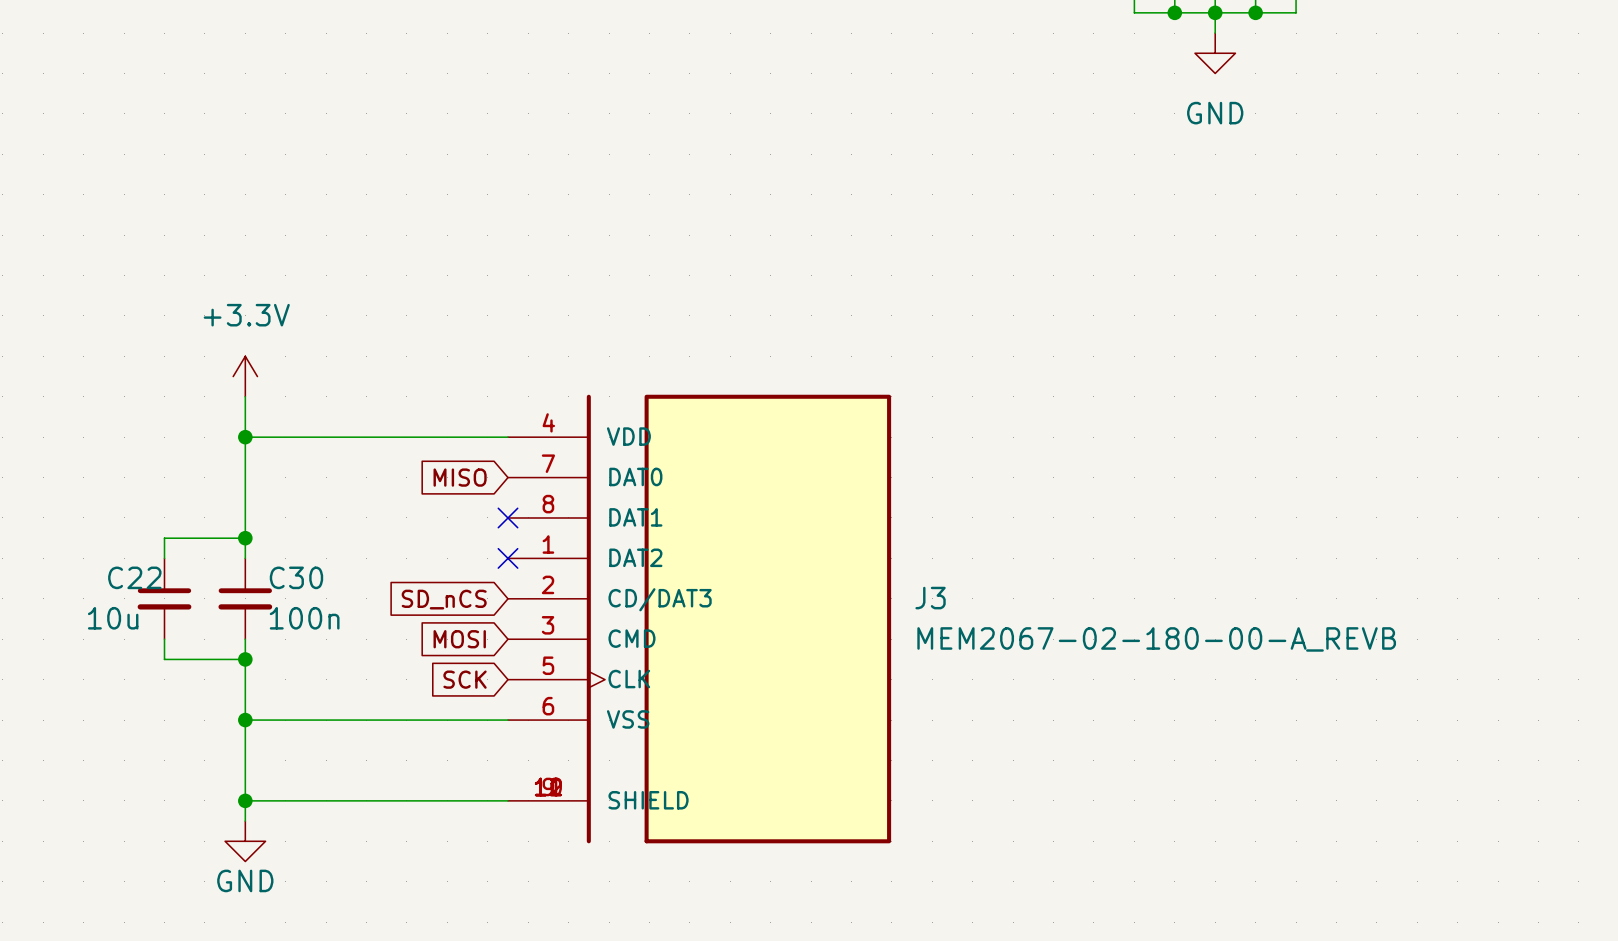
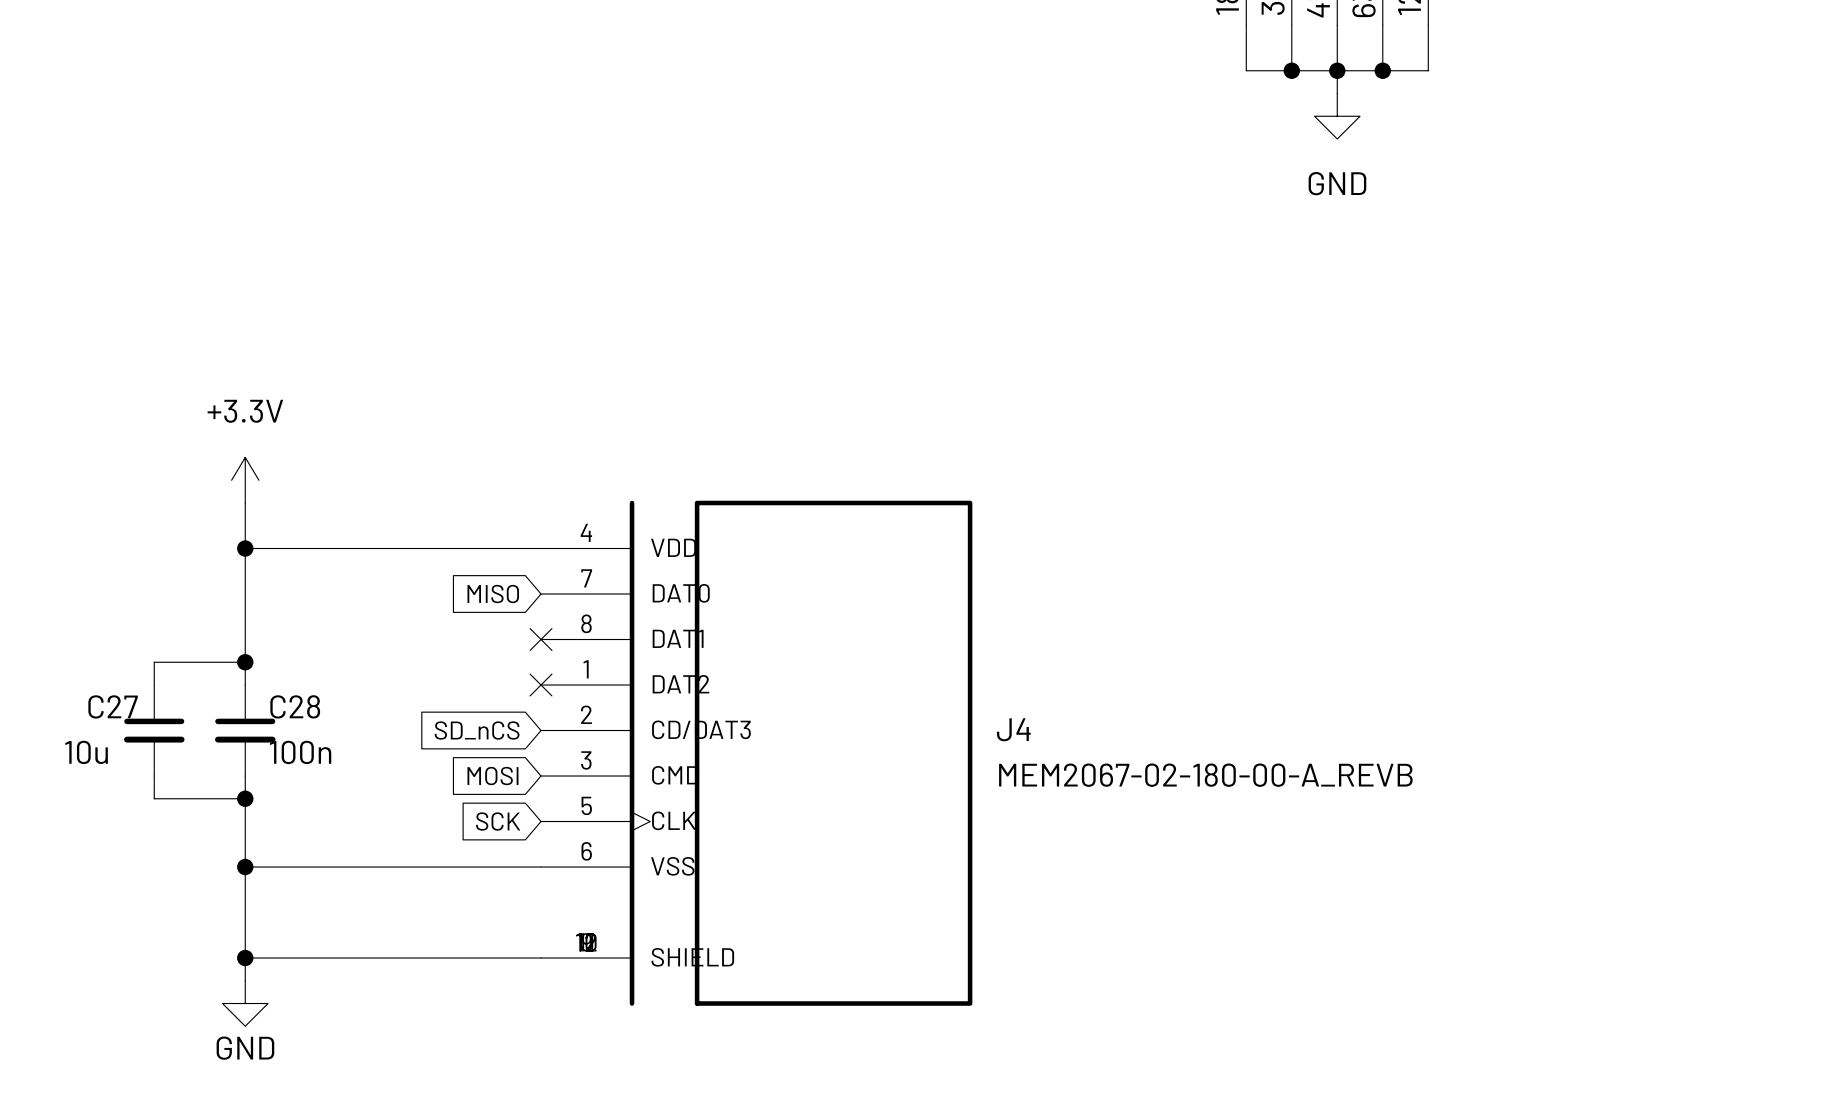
C22 name: C22 (134, 577) -> C27 (113, 706)
C30 name: C30 (296, 577) -> C28 (295, 706)
J3 name: J3 (930, 598) -> J4 (1013, 729)

